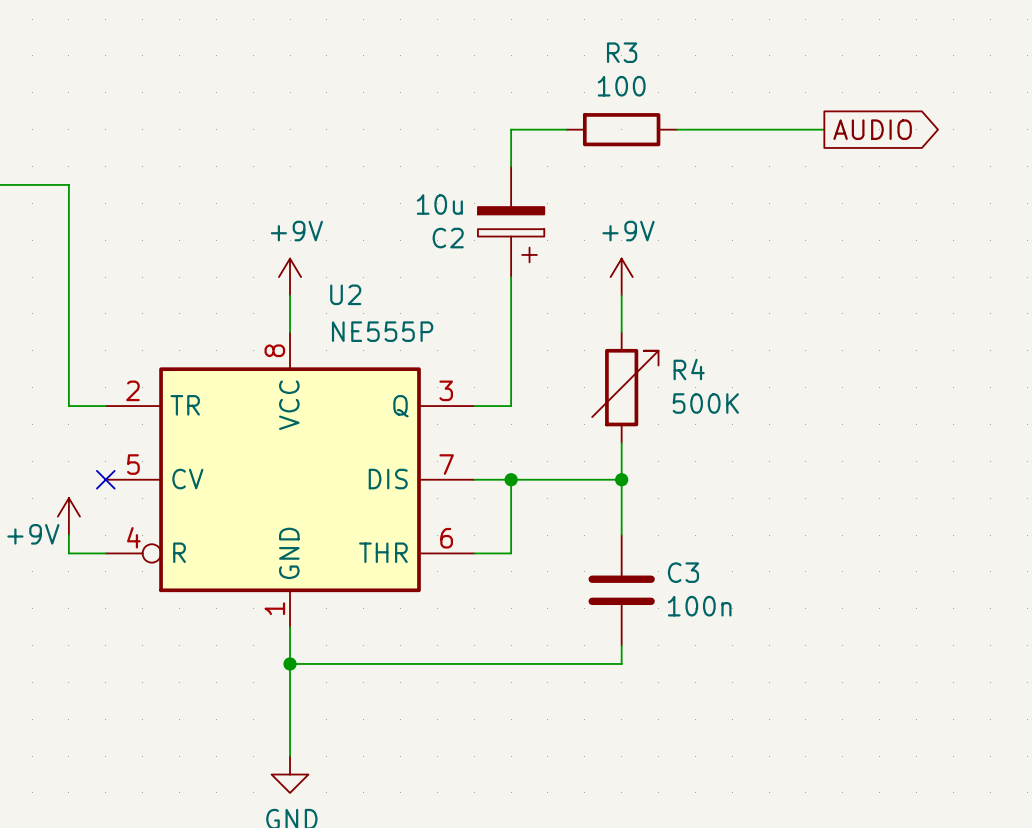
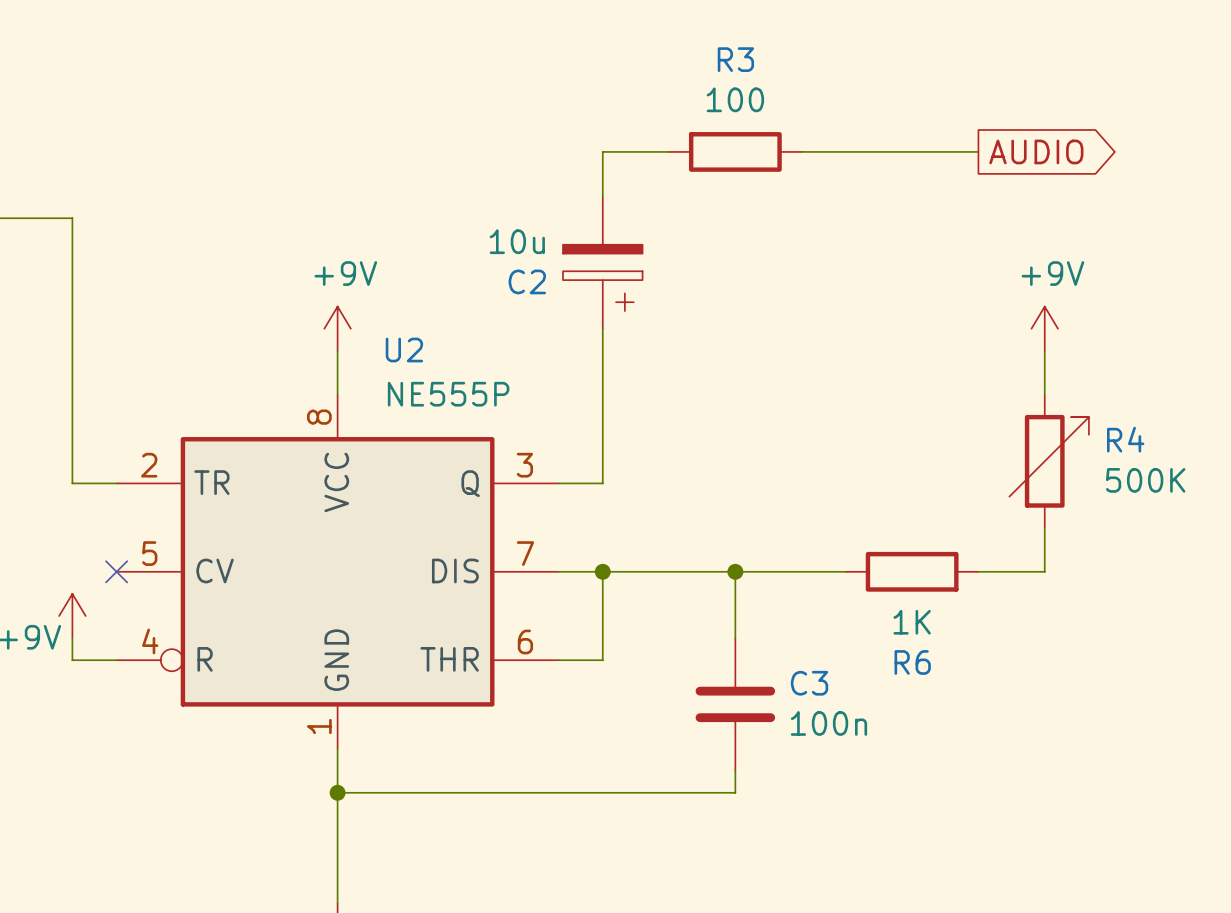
power symbol position: +9V (621, 277) -> +9V (1044, 328)
wire: (621, 295) (621, 332) -> (1044, 350) (1044, 395)
R4 position: (625, 387) -> (1049, 461)
wire: (621, 442) (621, 479) -> (845, 571) (735, 571)
wire: none -> (1044, 527) (1044, 571) (978, 571)
R6: none -> 1K (912, 571)

